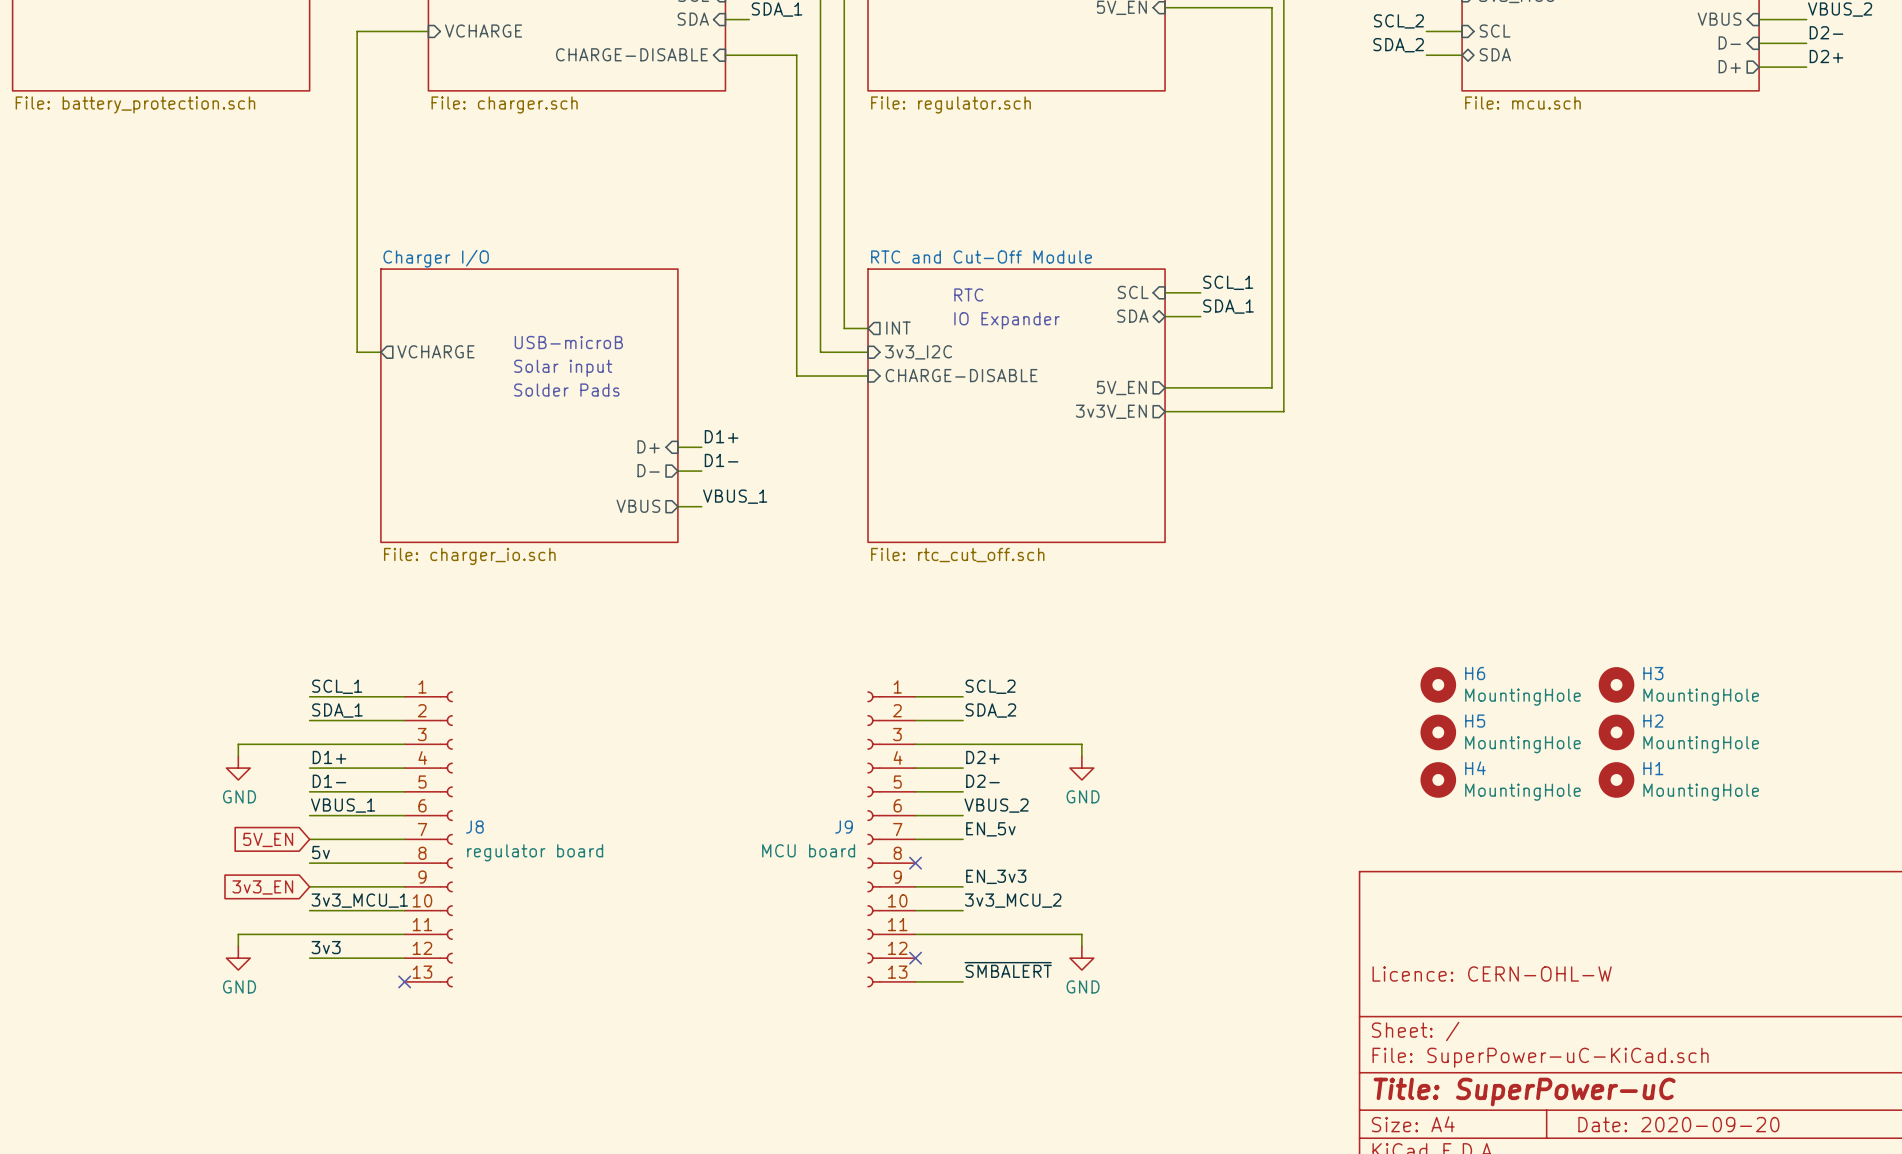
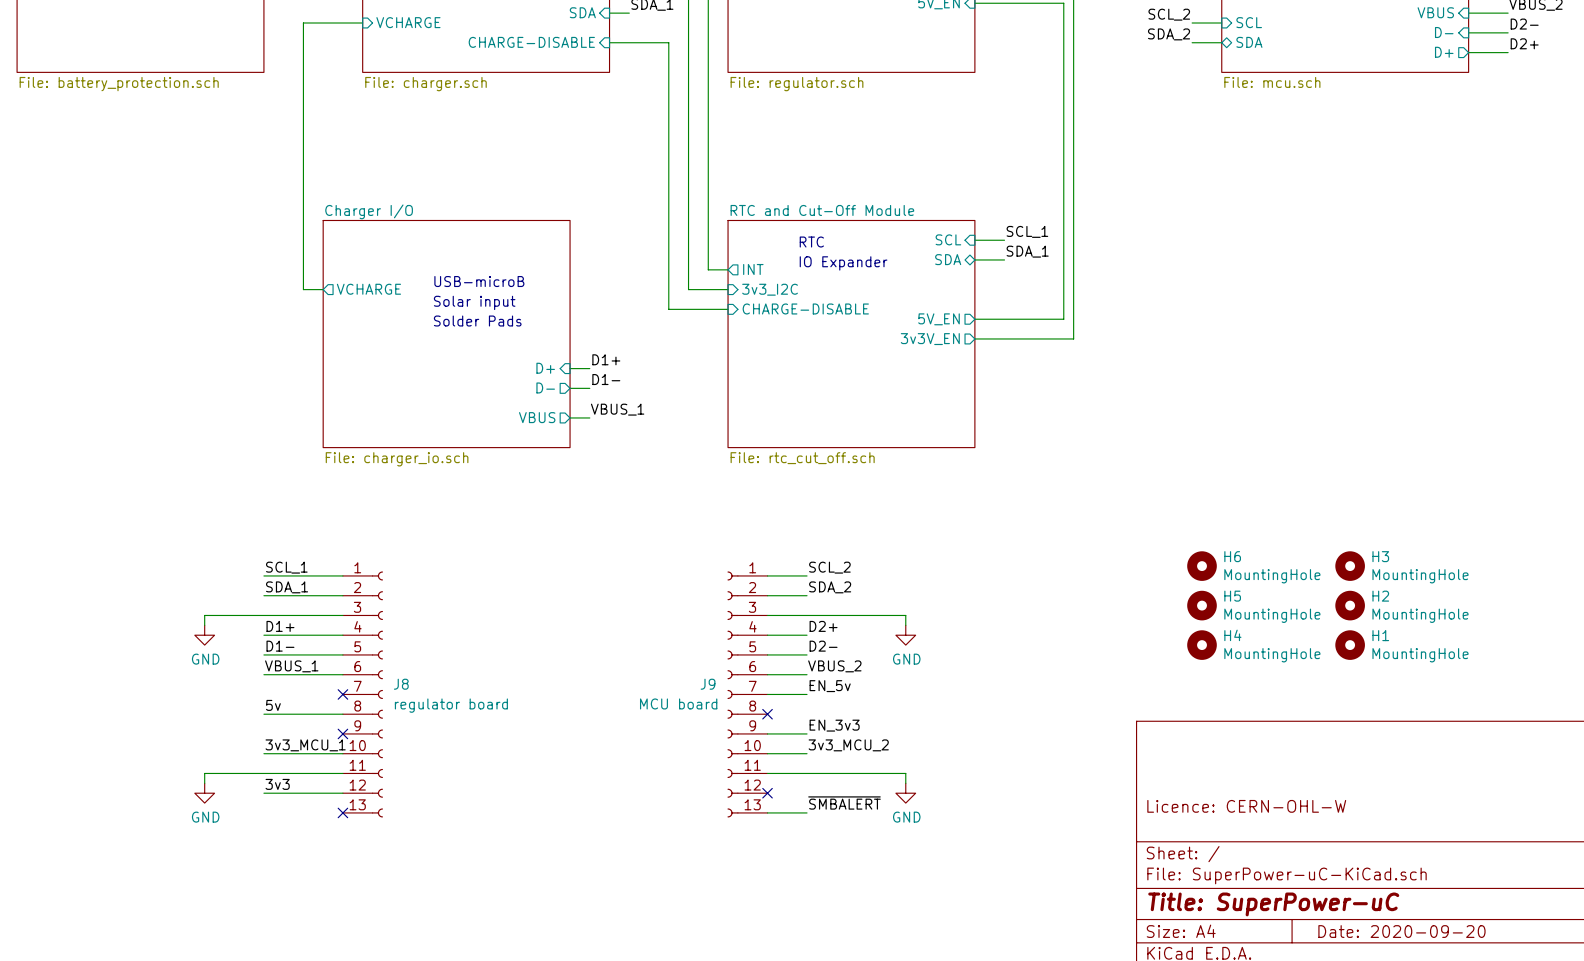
global label: 5V_EN (268, 839) -> none
wire: (309, 839) (404, 839) -> none
no-connect mark: none -> (342, 694)
wire: (309, 886) (404, 886) -> none
no-connect mark: none -> (342, 733)
global label: 3v3_EN (262, 887) -> none

